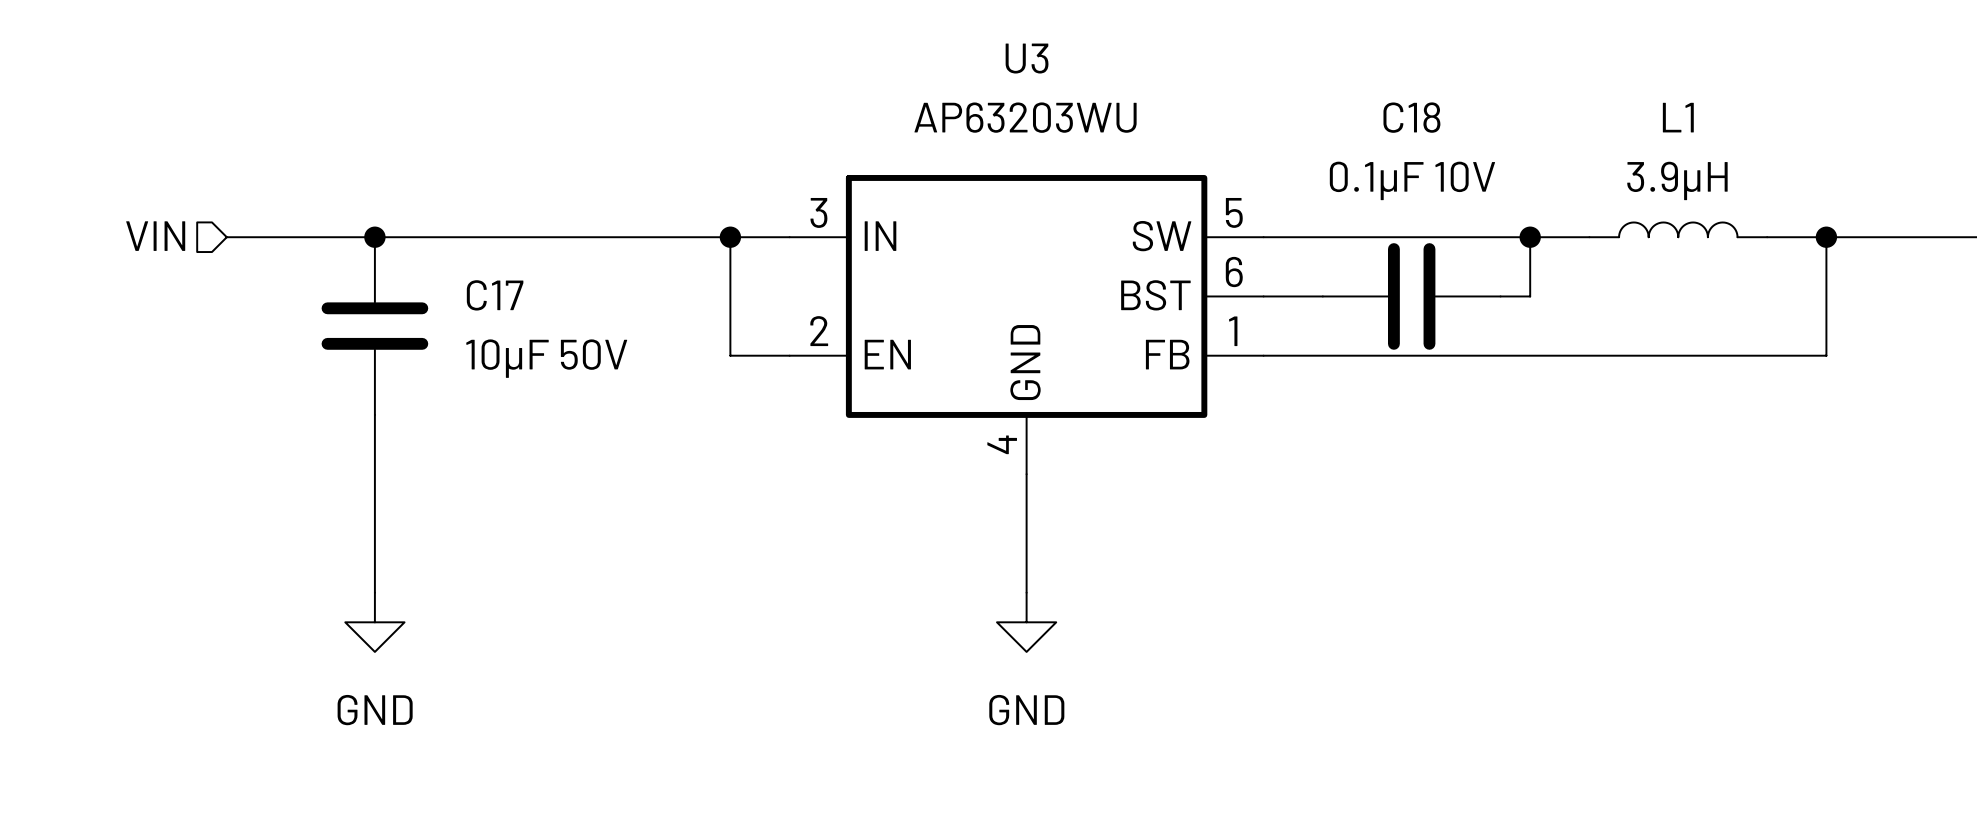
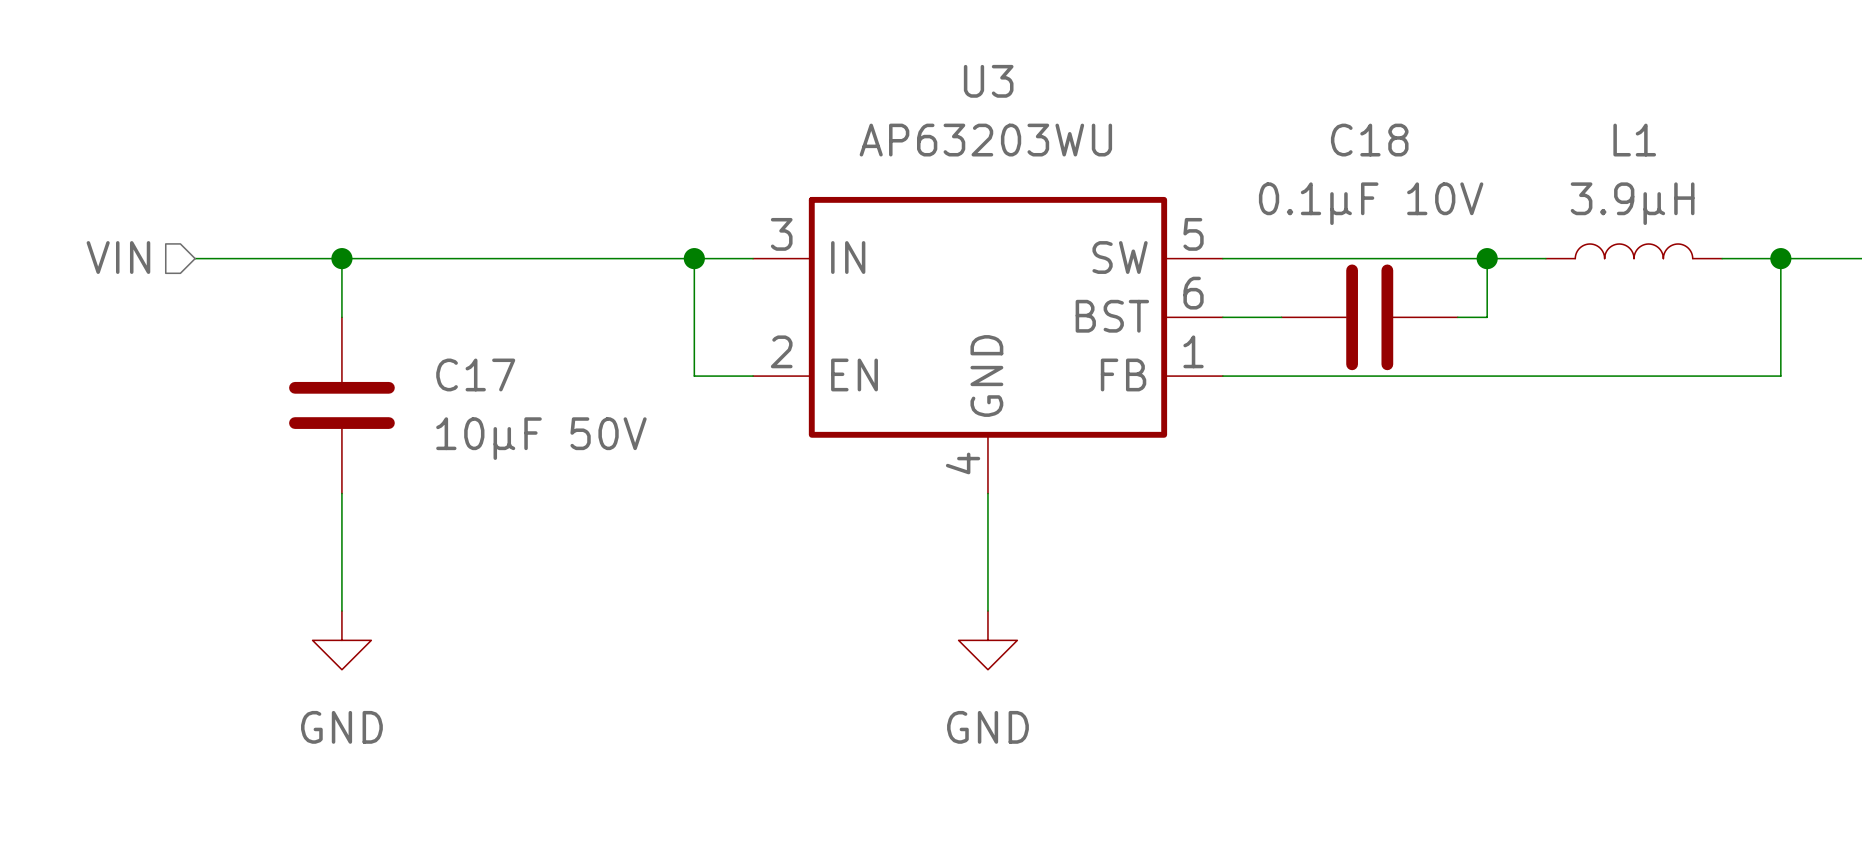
C17 position: (374, 326) -> (341, 405)

